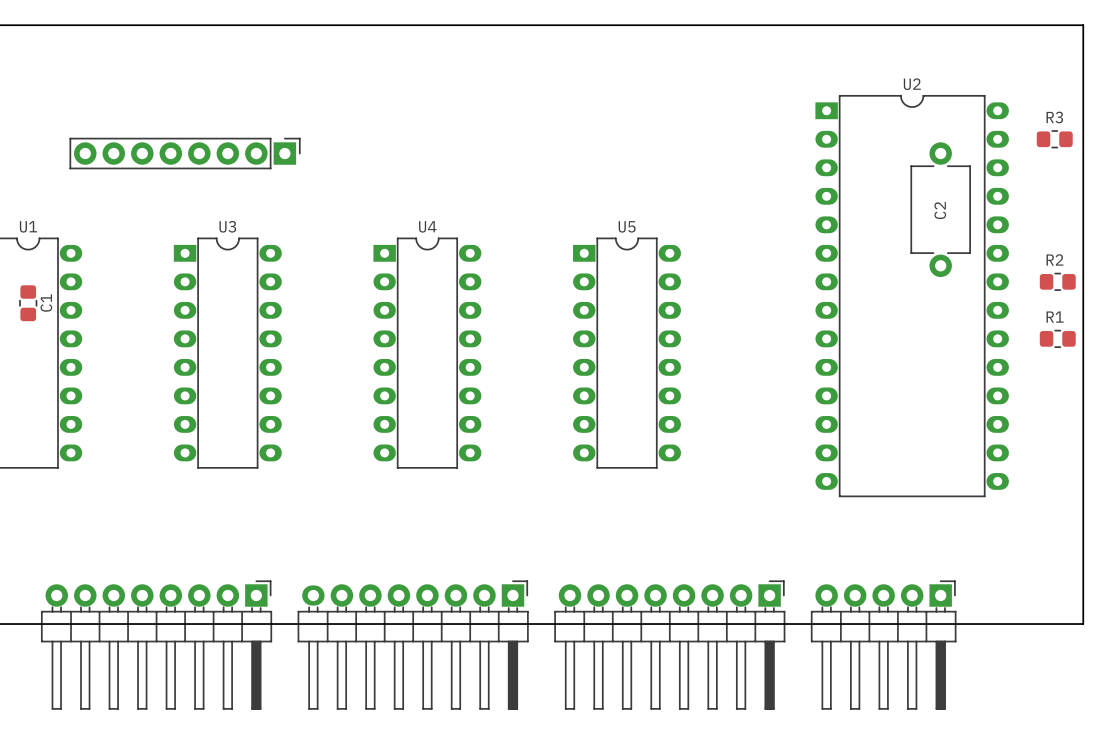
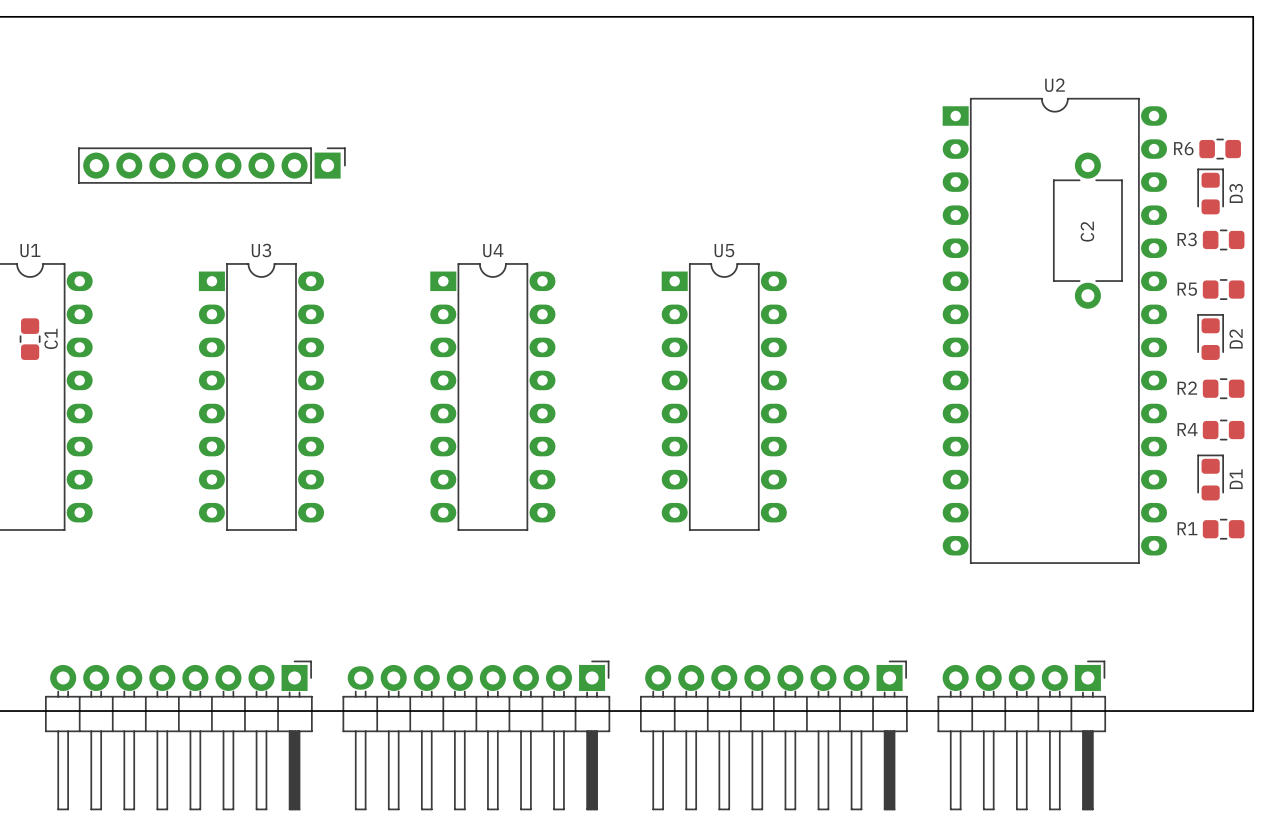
R3 name: R3 (1054, 117) -> R6 (1183, 148)
D3: none -> (1210, 191)
R3: none -> (1223, 239)
R2 name position: R2 (1054, 259) -> R2 (1187, 388)
R5: none -> (1223, 289)
R2 position: (1057, 281) -> (1223, 388)
D2: none -> (1210, 337)
R1 name position: R1 (1055, 317) -> R1 (1187, 528)
R1 position: (1057, 338) -> (1223, 529)
R4: none -> (1223, 430)
D1: none -> (1210, 477)

